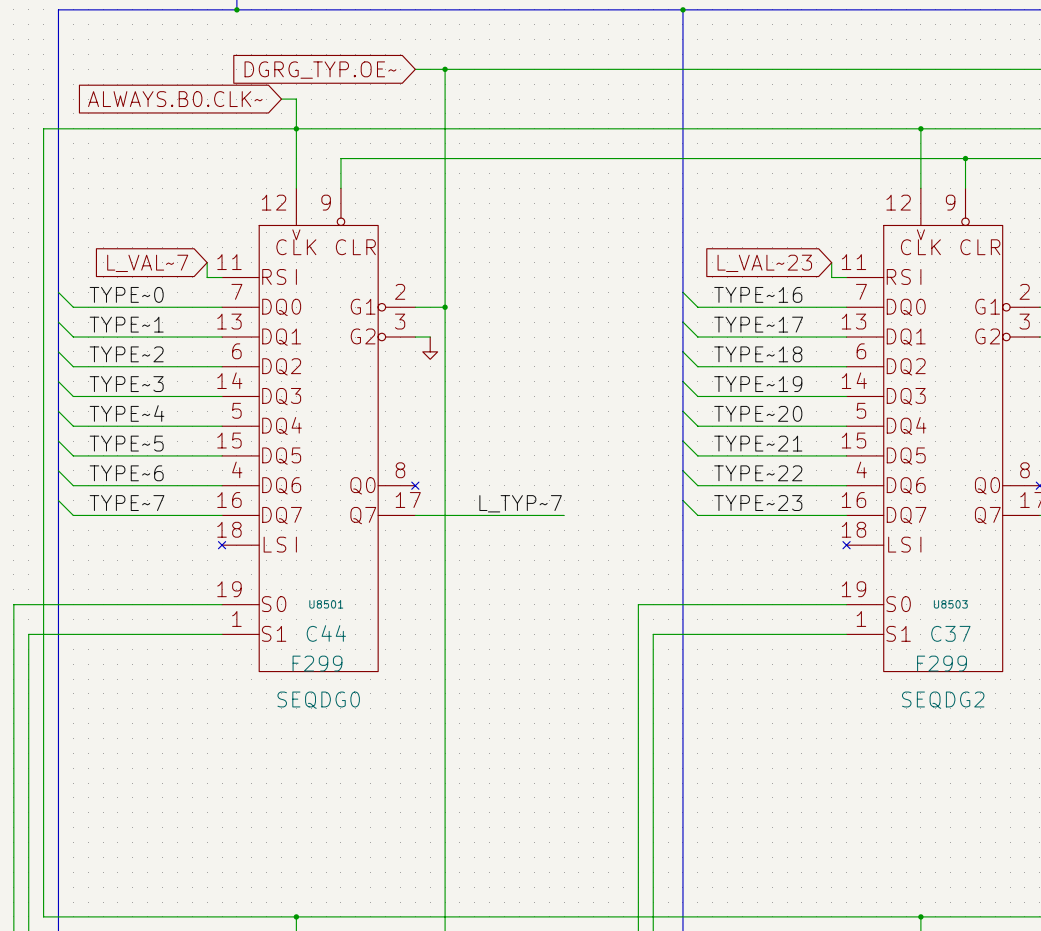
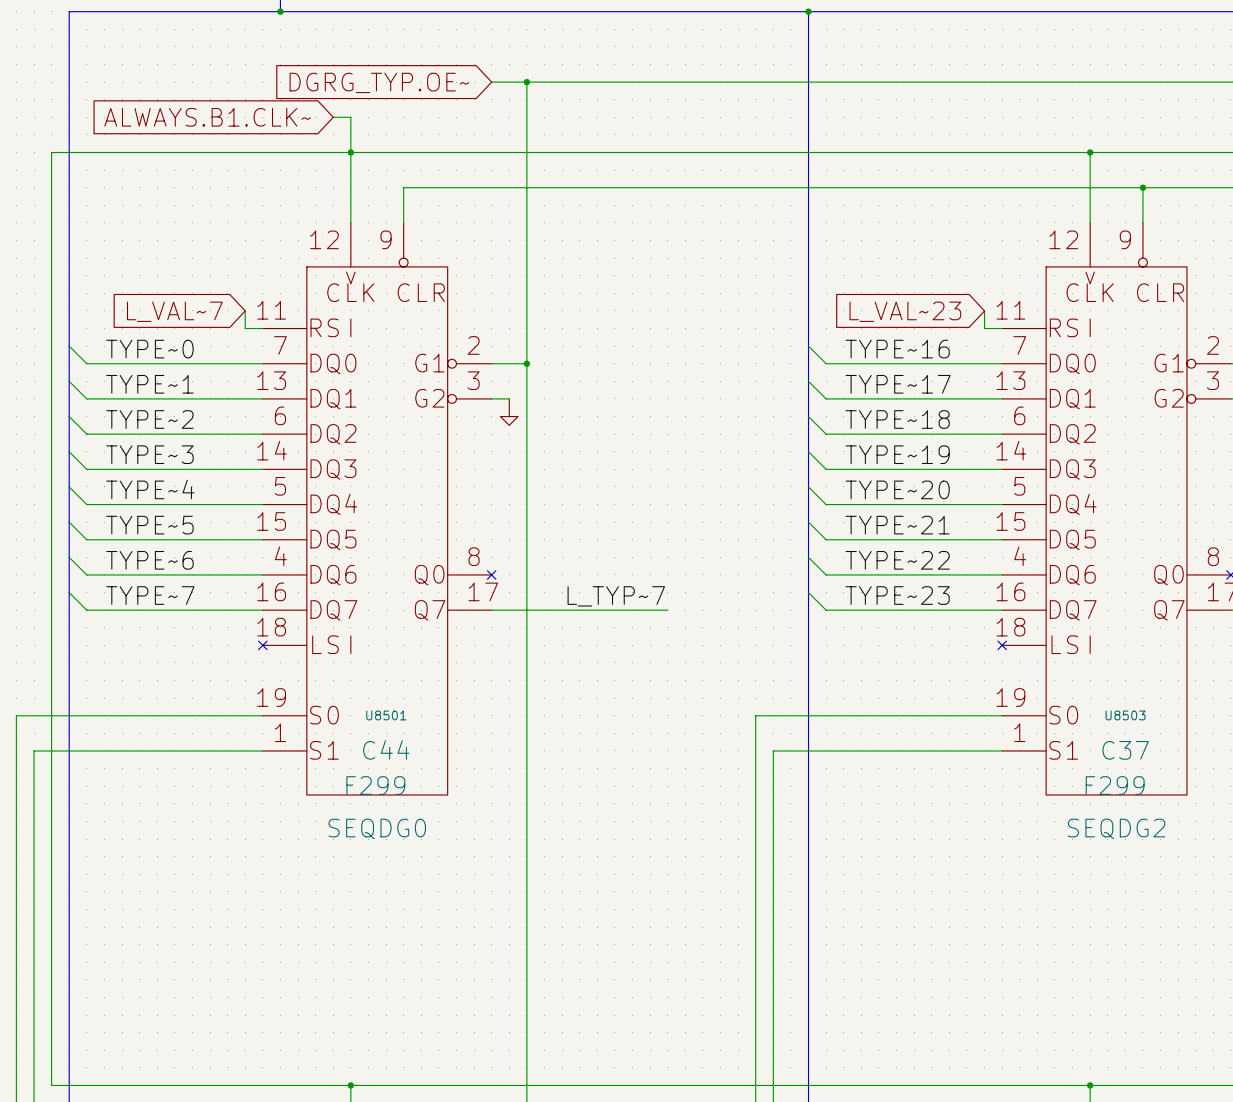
global label: ALWAYS.B0.CLK~ (175, 99) -> ALWAYS.B1.CLK~ (207, 117)

